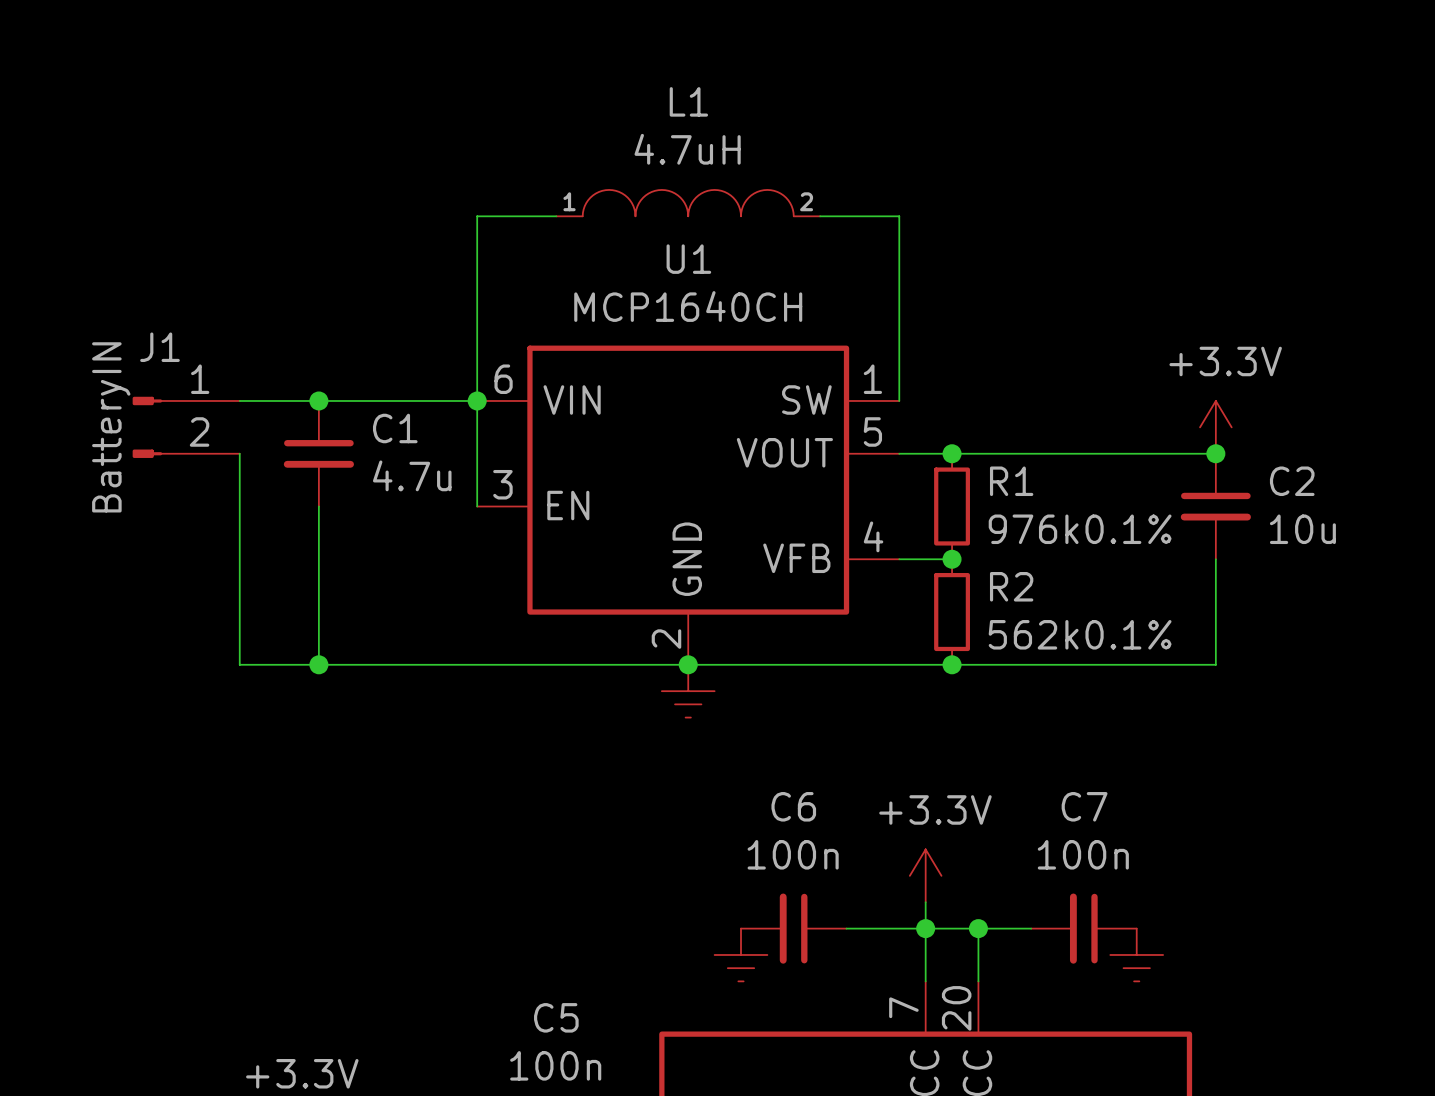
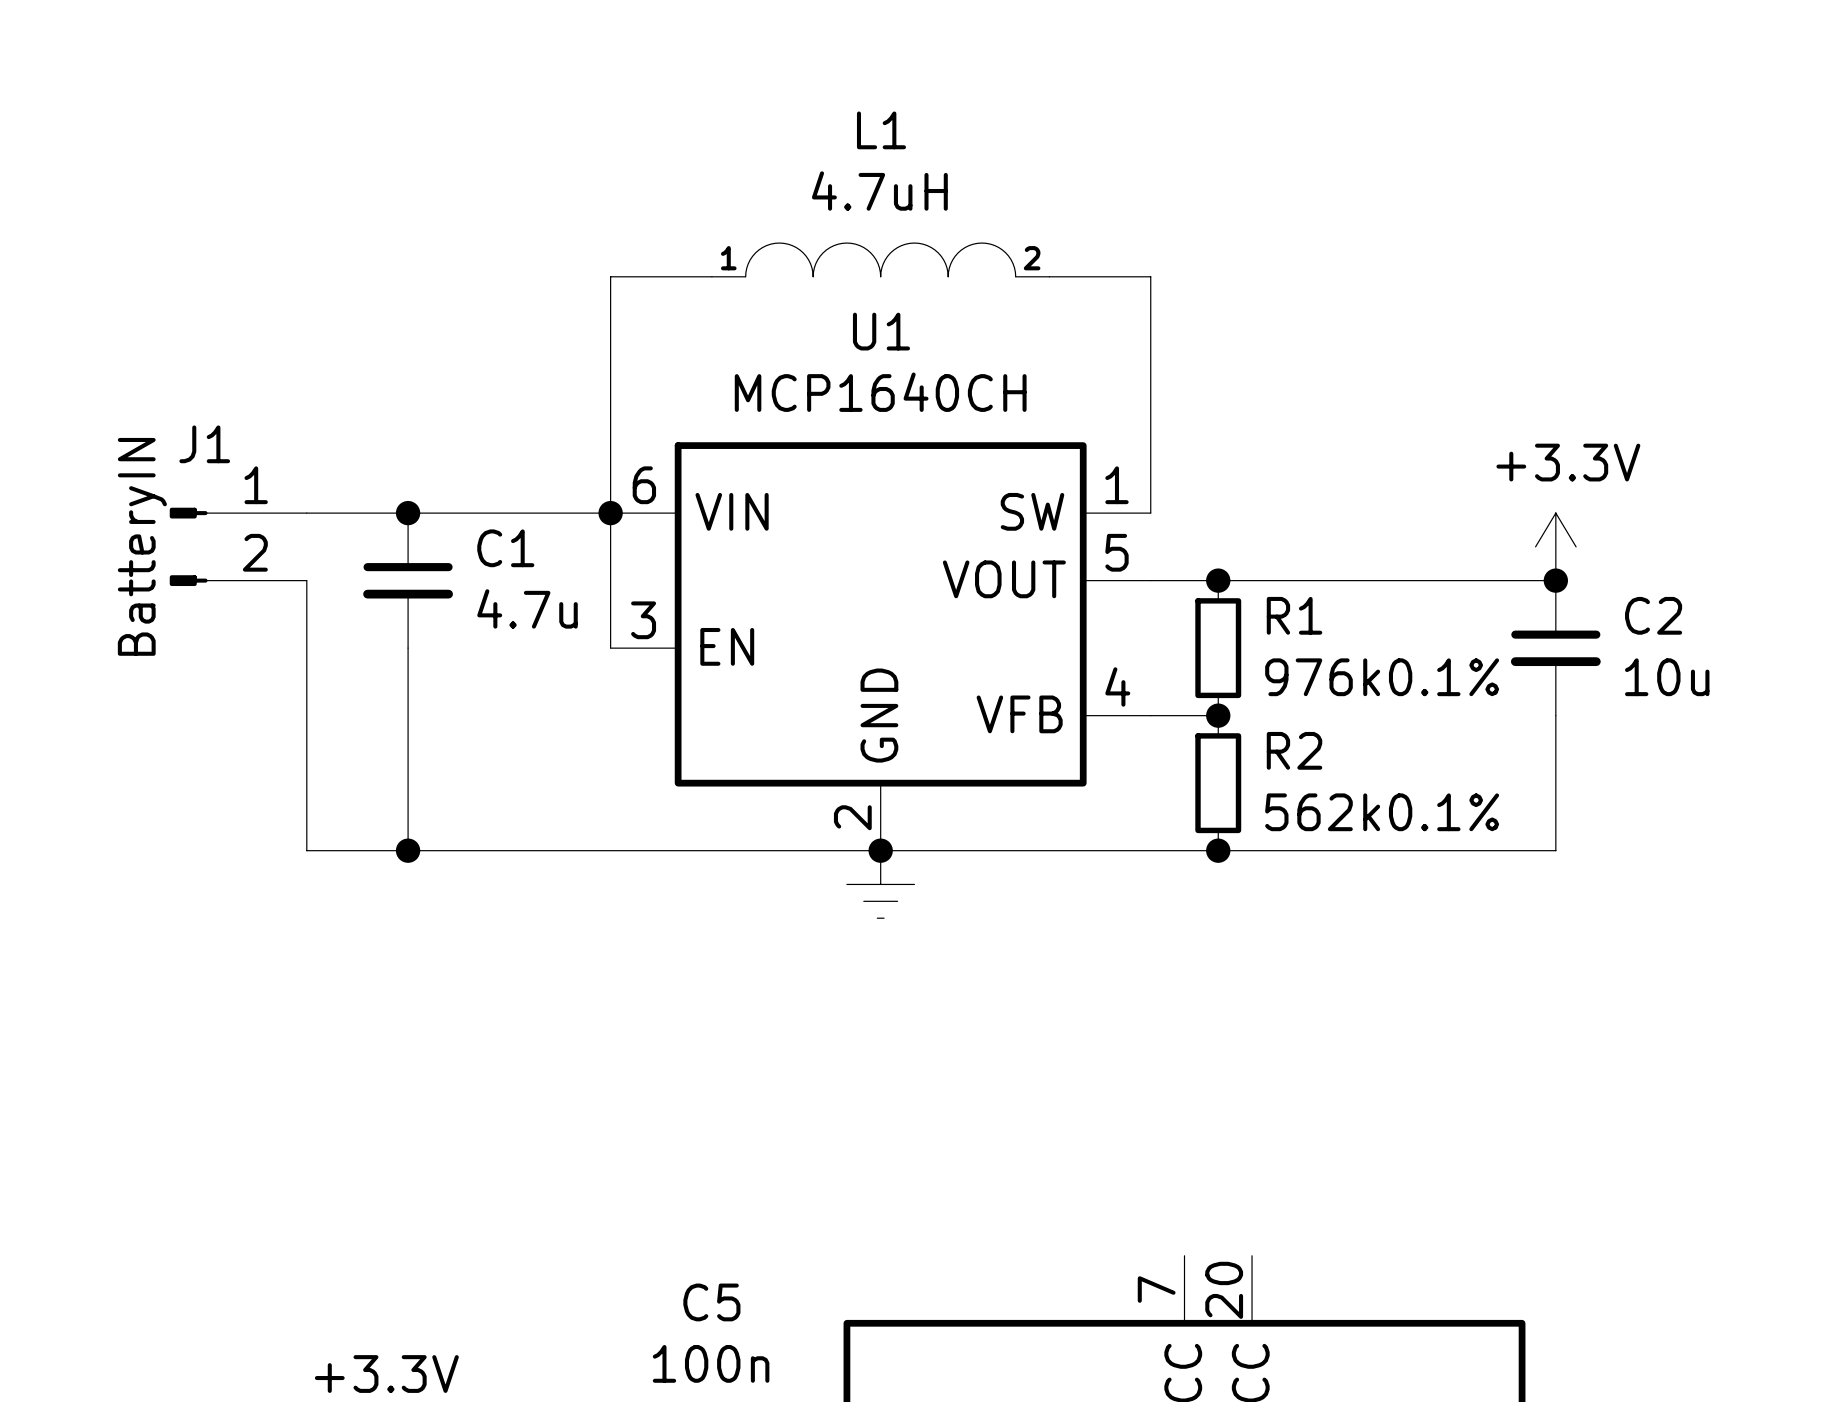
power symbol: +3.3V (925, 875) -> none
wire: (925, 902) (925, 981) -> none
C6: 100n (793, 928) -> none
wire: (846, 928) (1031, 928) -> none
junction: (925, 928) -> none
wire: (978, 928) (978, 981) -> none
junction: (978, 928) -> none
C7: 100n (1083, 928) -> none
power symbol: (741, 954) -> none
power symbol: (1136, 954) -> none

